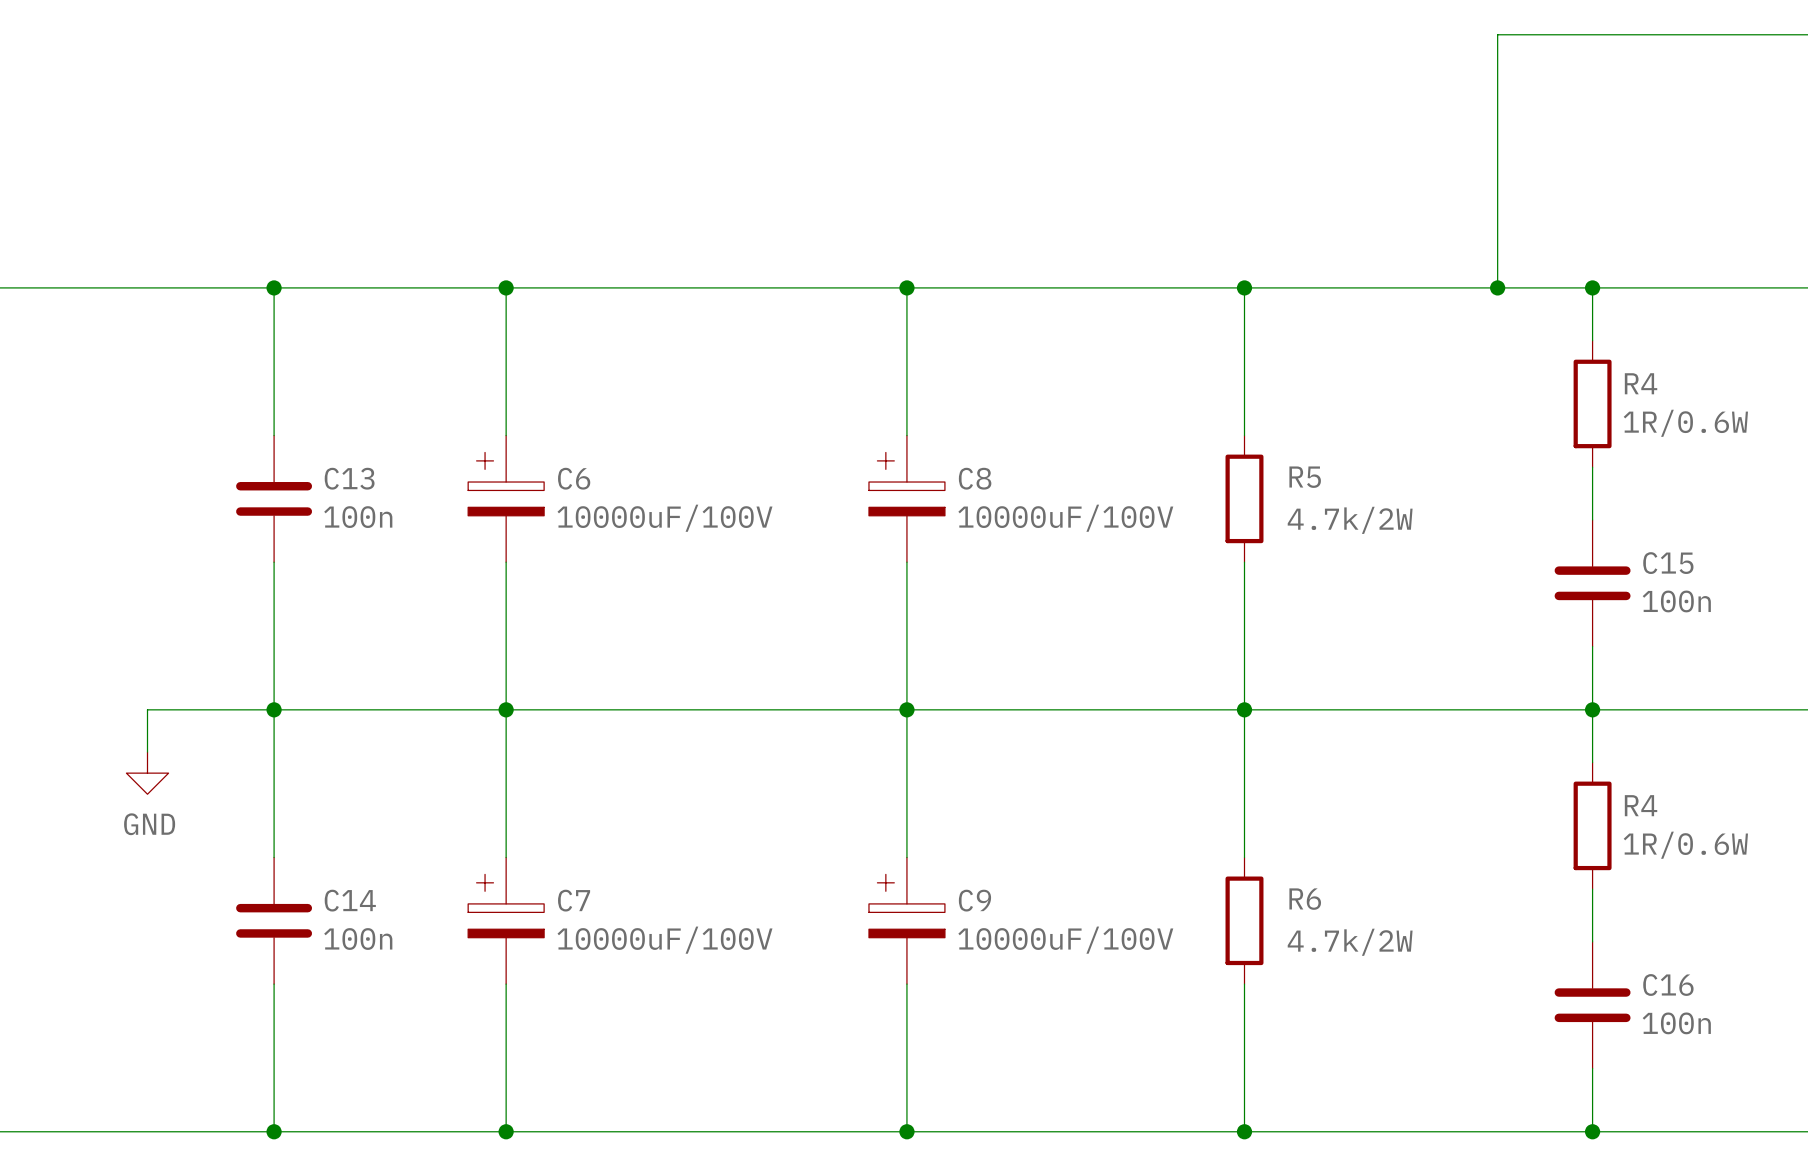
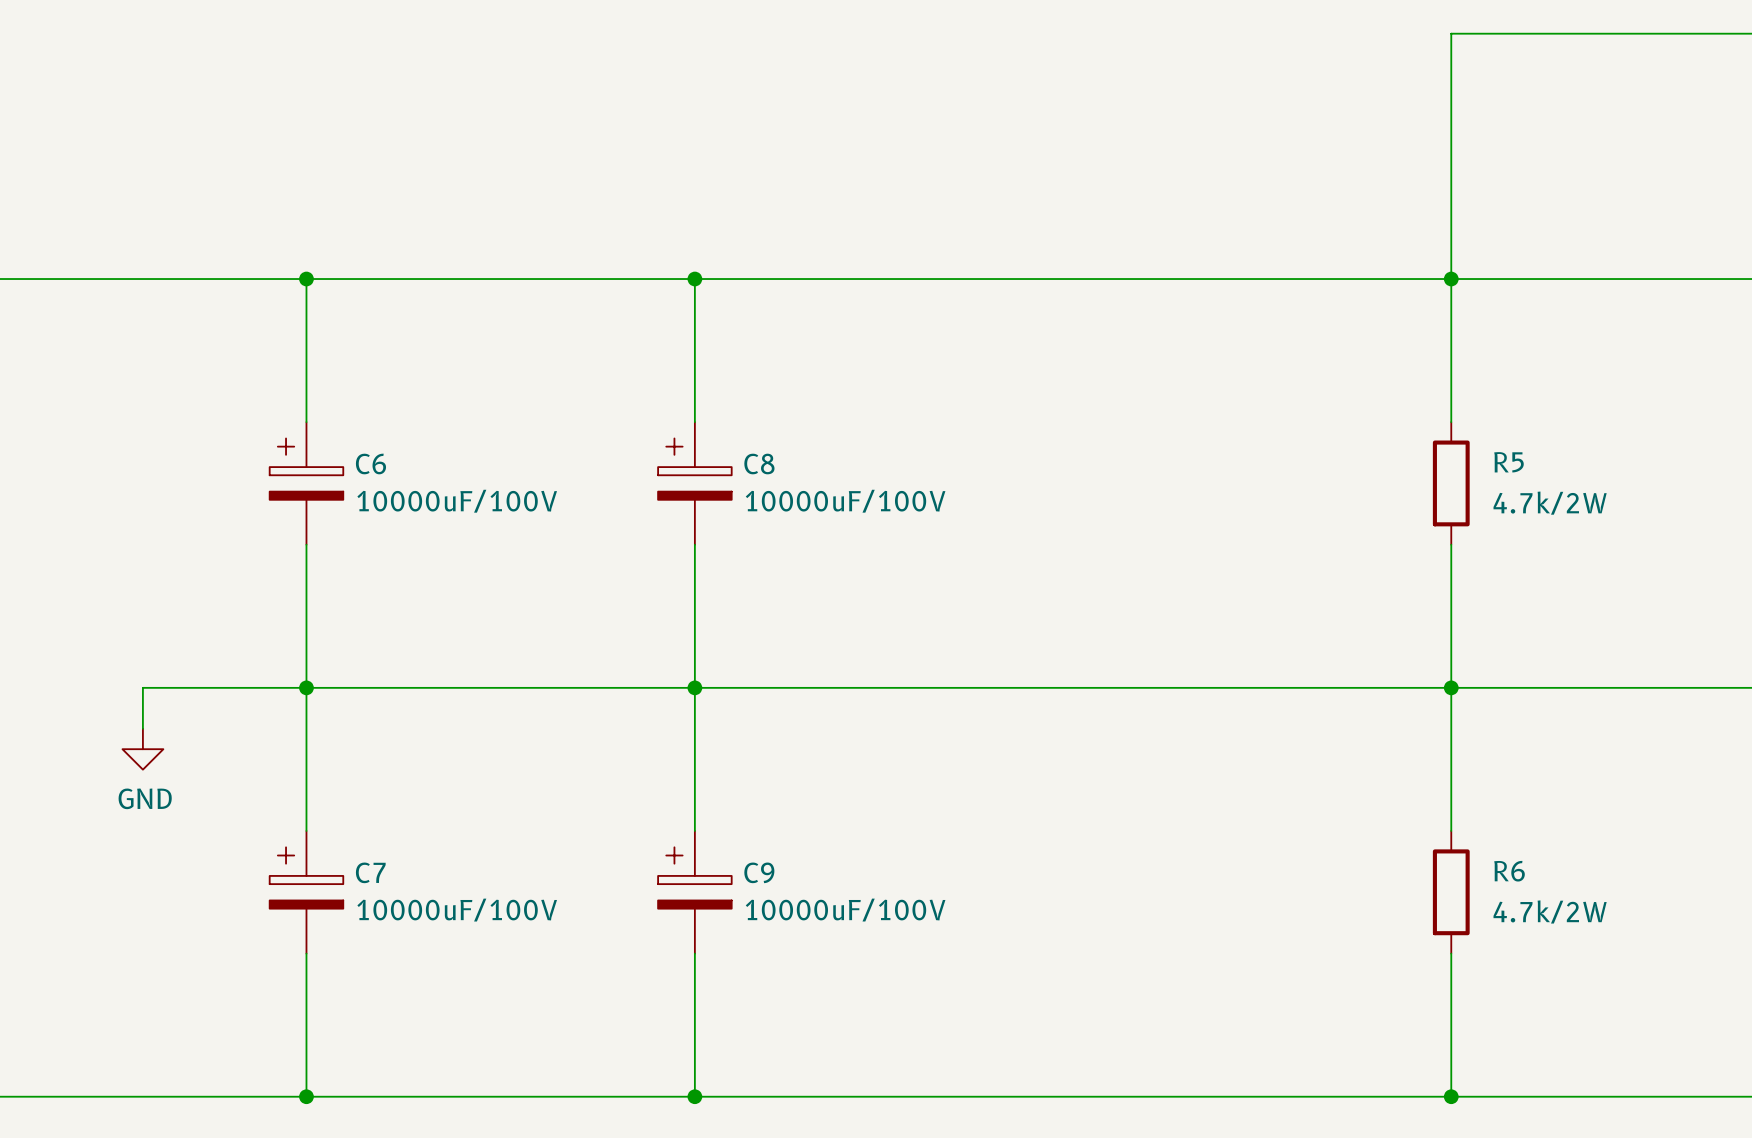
wire: (274, 287) (274, 435) -> none
junction position: (274, 287) -> (306, 279)
wire: (506, 287) (506, 435) -> (306, 279) (306, 422)
junction: (506, 287) -> none
junction: none -> (694, 279)
wire: (906, 287) (906, 435) -> (694, 279) (694, 422)
junction: (906, 287) -> none
wire: (1244, 287) (1244, 435) -> (1451, 279) (1451, 422)
junction: (1244, 287) -> none
wire: (1592, 287) (1592, 340) -> none
junction: (1592, 287) -> none
R4: 1R/0.6W (1592, 403) -> none
wire: (1592, 467) (1592, 519) -> none
C13: 100n (274, 498) -> none
C6 position: (506, 498) -> (306, 483)
C8 position: (906, 498) -> (694, 483)
R5 position: (1244, 498) -> (1451, 483)
wire: (274, 562) (274, 857) -> none
wire: (506, 562) (506, 857) -> (306, 544) (306, 830)
wire: (906, 562) (906, 857) -> (694, 544) (694, 830)
wire: (1244, 562) (1244, 857) -> (1451, 544) (1451, 830)
C15: 100n (1592, 583) -> none
wire: (1592, 646) (1592, 762) -> none
junction position: (274, 709) -> (306, 687)
junction: (506, 709) -> none
junction: none -> (694, 687)
junction: (906, 709) -> none
junction: (1244, 709) -> none
junction position: (1592, 709) -> (1451, 687)
R4: 1R/0.6W (1592, 825) -> none
wire: (1592, 889) (1592, 941) -> none
C14: 100n (274, 920) -> none
C7 position: (506, 920) -> (306, 892)
C9 position: (906, 920) -> (694, 892)
R6 position: (1244, 920) -> (1451, 892)
wire: (274, 984) (274, 1131) -> none
wire: (506, 984) (506, 1131) -> (306, 953) (306, 1096)
wire: (906, 984) (906, 1131) -> (694, 953) (694, 1096)
wire: (1244, 984) (1244, 1131) -> (1451, 953) (1451, 1096)
C16: 100n (1592, 1005) -> none
wire: (1592, 1068) (1592, 1131) -> none
junction position: (274, 1131) -> (306, 1096)
junction: (506, 1131) -> none
junction: none -> (694, 1096)
junction: (906, 1131) -> none
junction: (1244, 1131) -> none
junction position: (1592, 1131) -> (1451, 1096)

